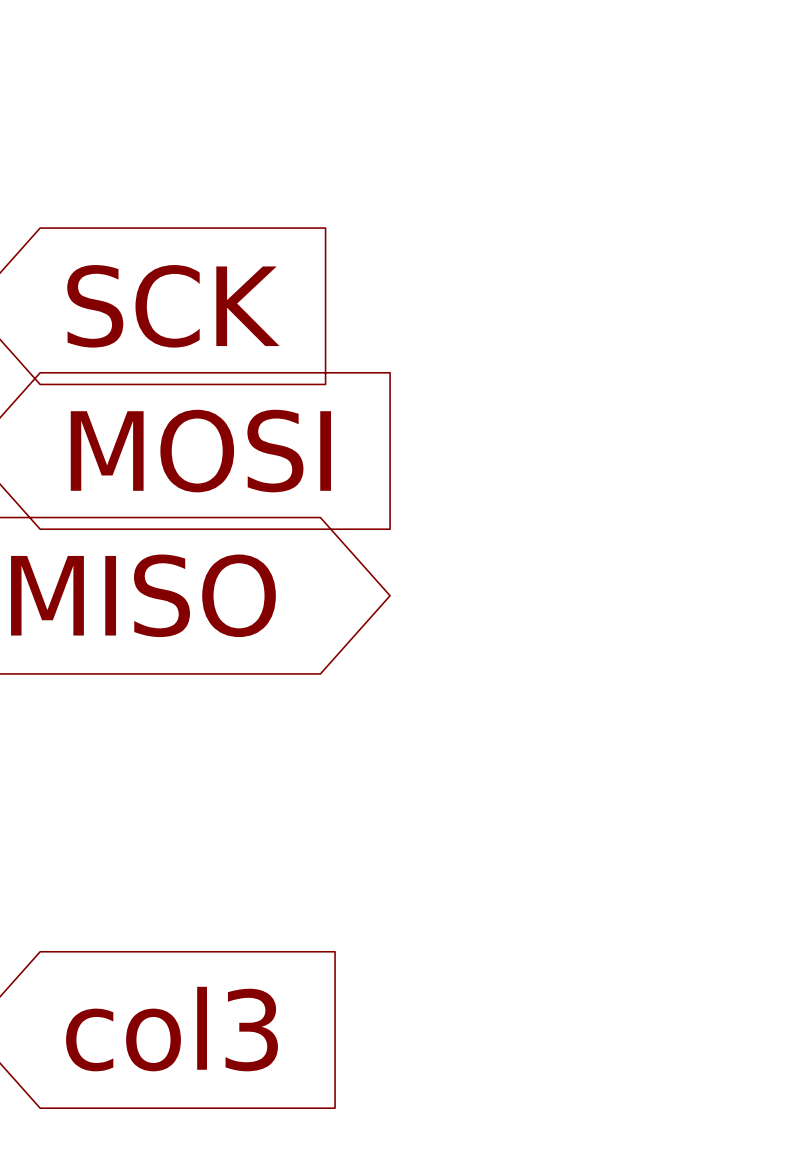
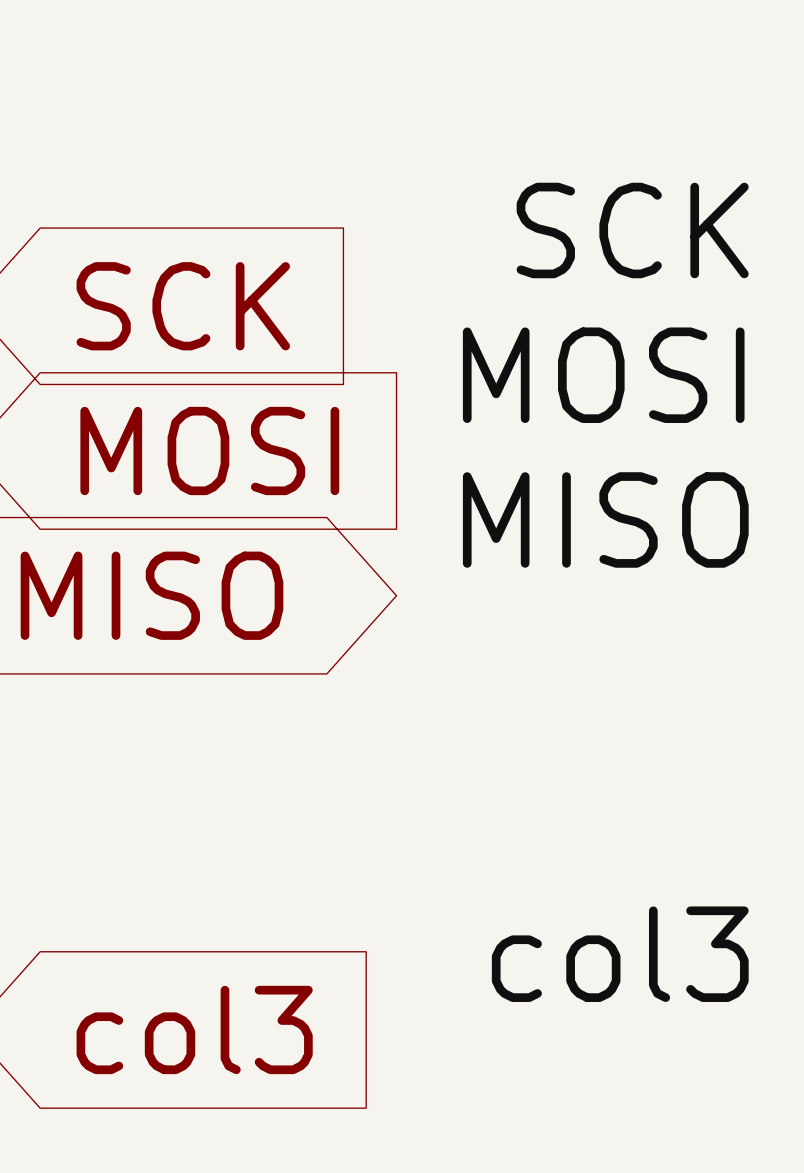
label: none -> SCK (632, 230)
label: none -> MOSI (603, 375)
label: none -> MISO (605, 519)
label: none -> col3 (620, 954)

